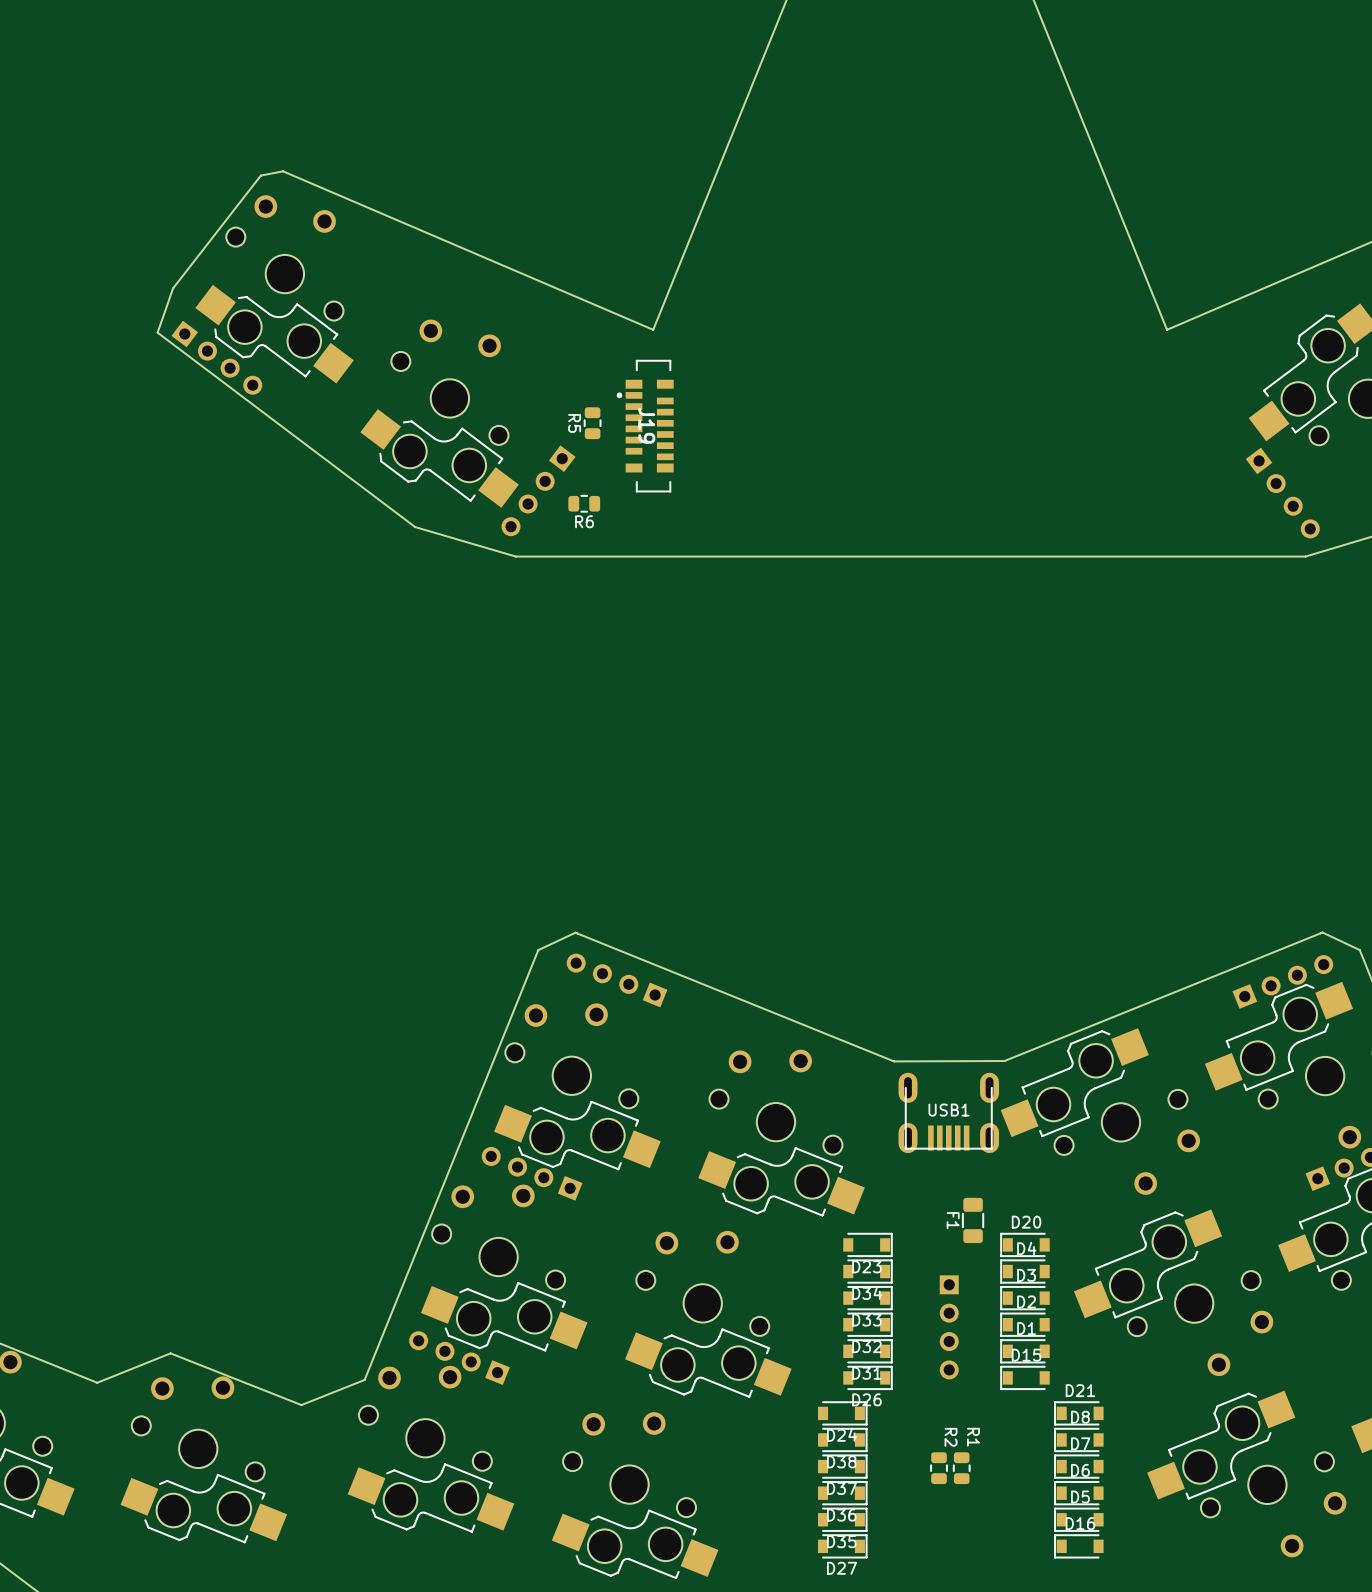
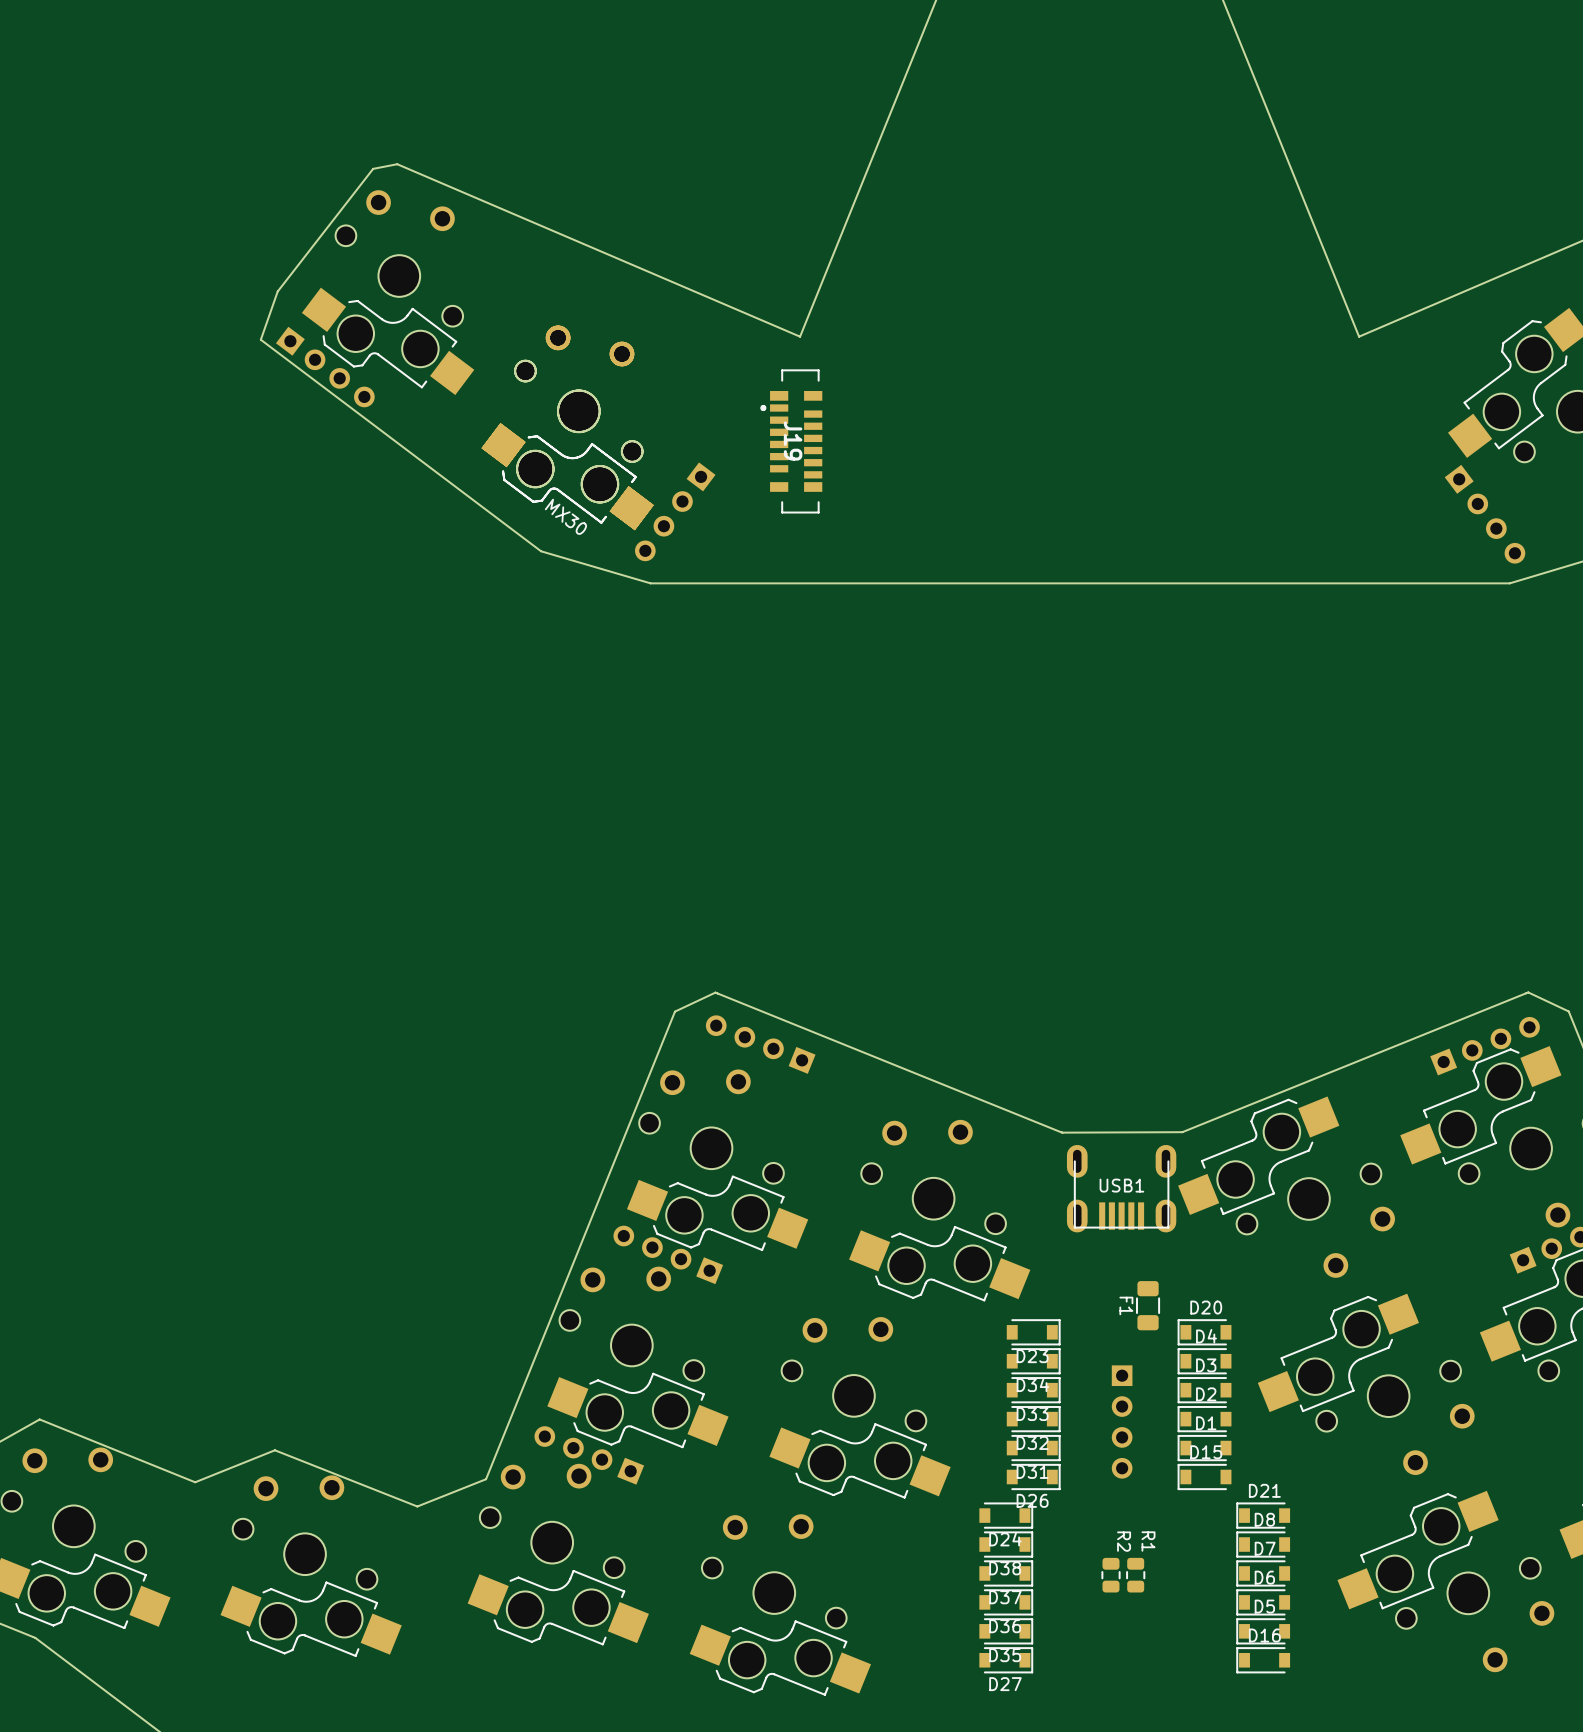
MX30: none -> (567, 427)
R5: (592, 423) -> none
R6: (584, 503) -> none

